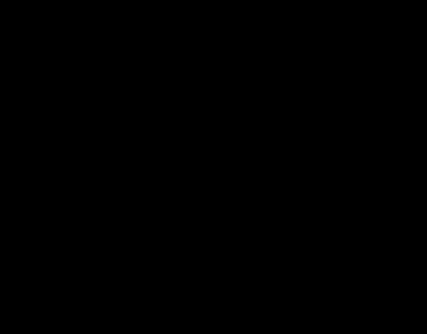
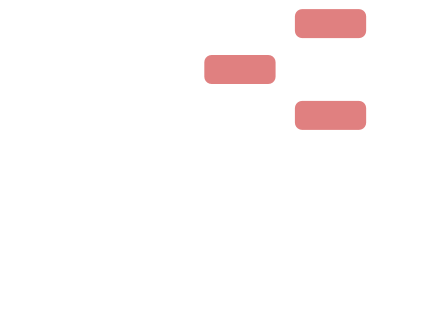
part: none -> (285, 69)

